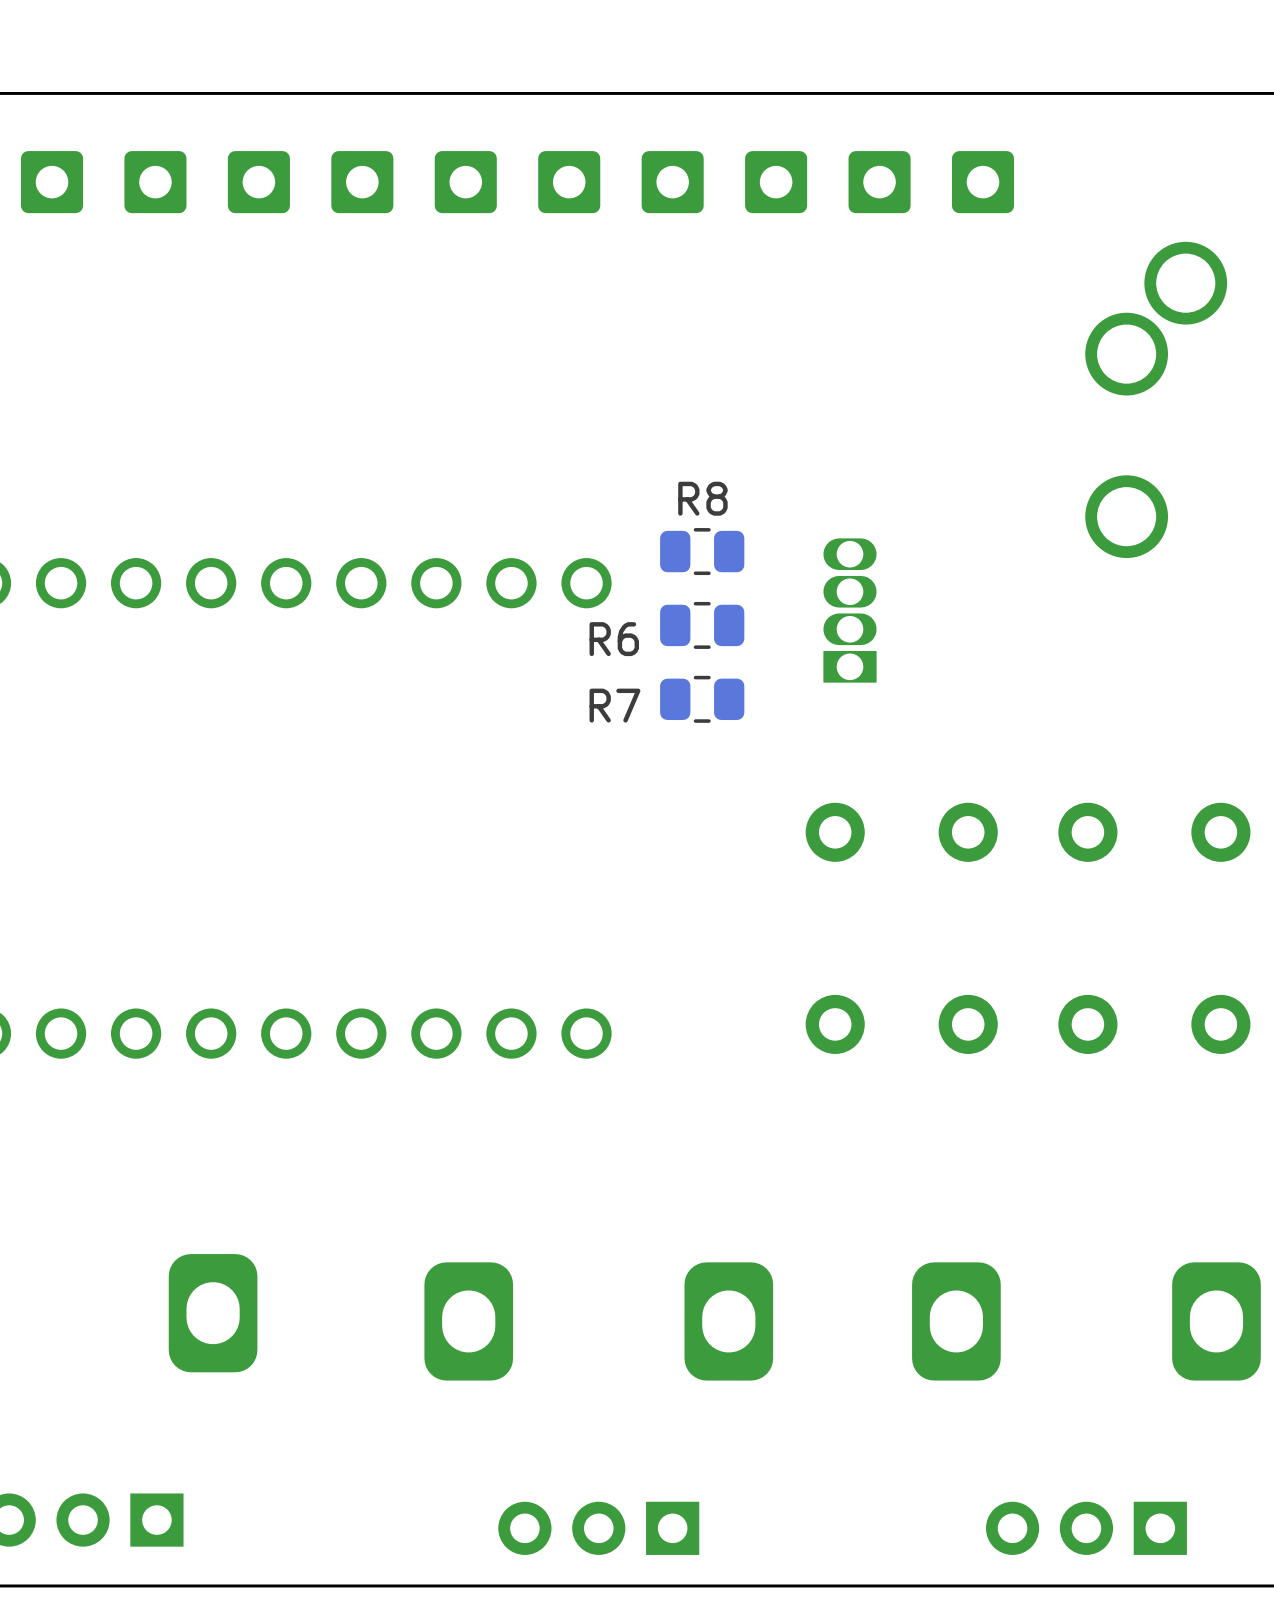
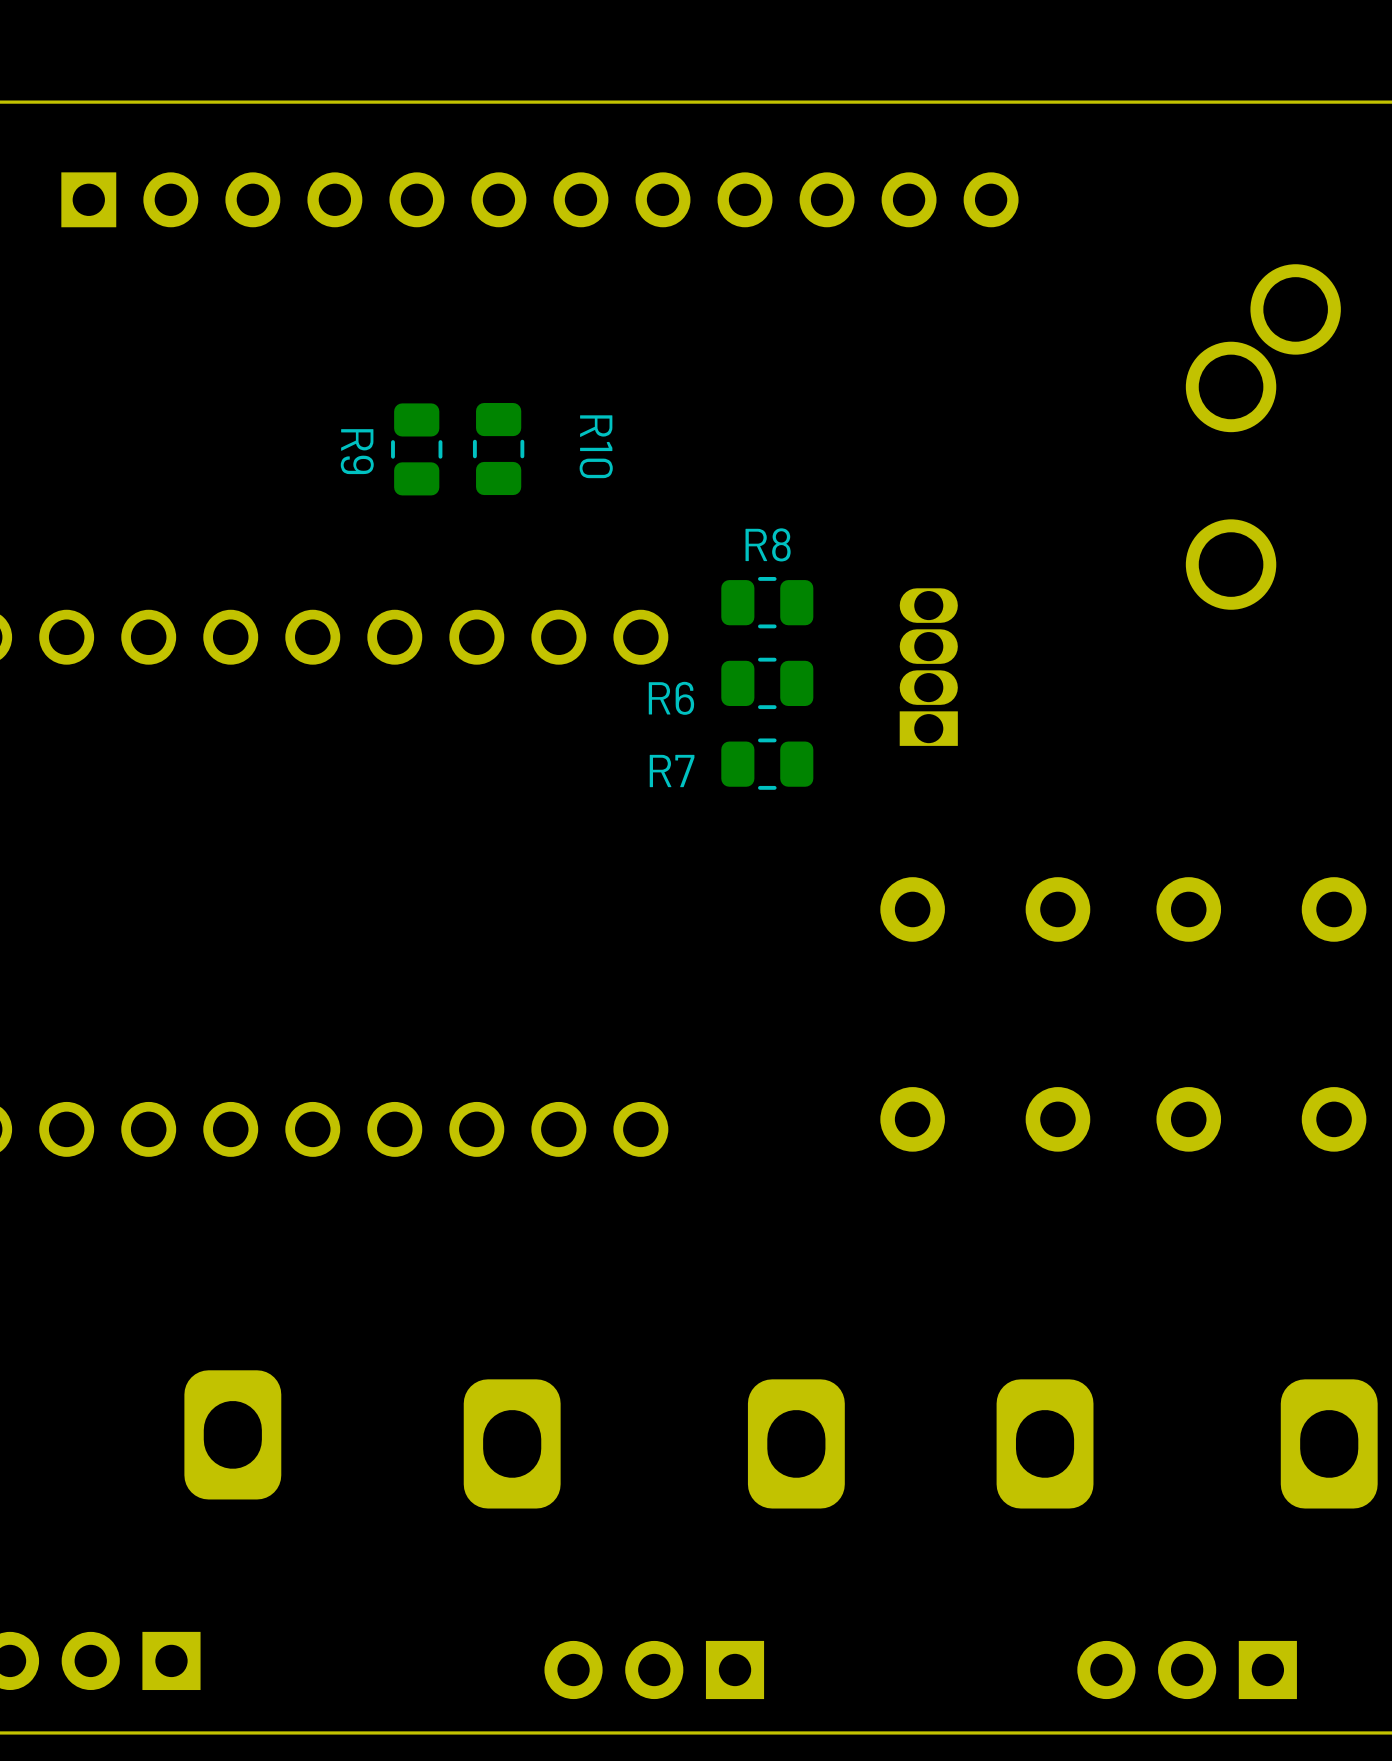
part footprint: [434, 151, 497, 214] -> [61, 172, 1019, 228]
part: (52, 182) -> none
part: (155, 182) -> none
part: (258, 182) -> none
part: (362, 182) -> none
part: (569, 182) -> none
part: (672, 182) -> none
part: (776, 182) -> none
part: (879, 182) -> none
part: (982, 182) -> none
R10: none -> (498, 449)
R9: none -> (416, 449)

